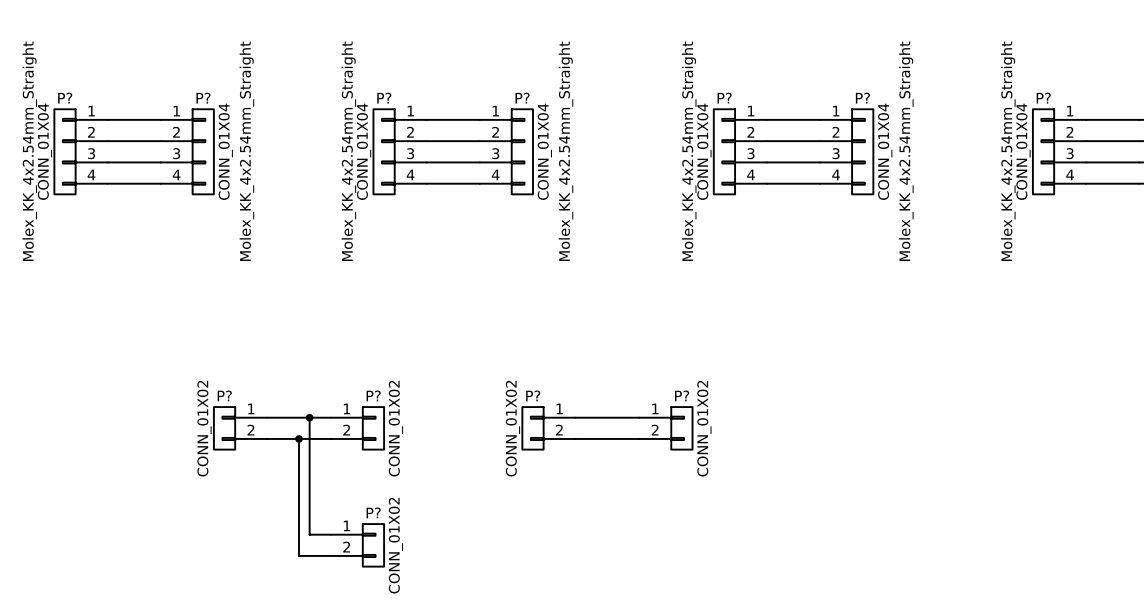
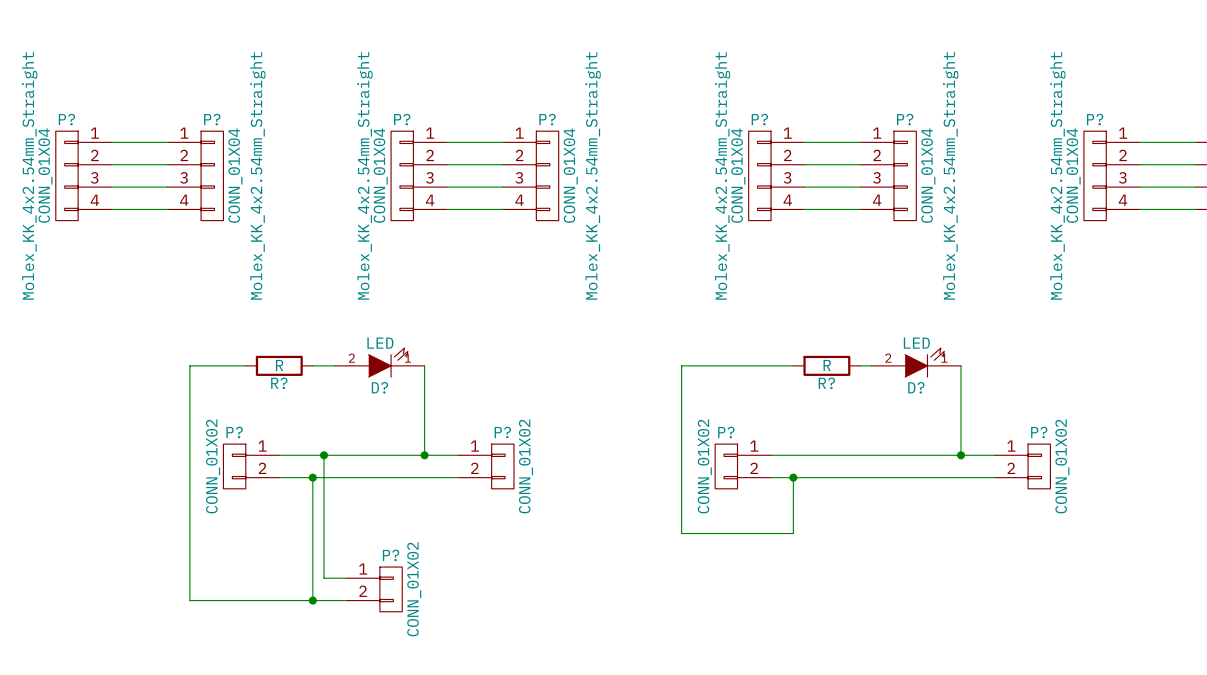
D?: none -> LED (379, 362)
D?: none -> LED (916, 362)
wire: none -> (245, 365) (189, 365) (189, 600) (312, 600)
R?: none -> R (279, 365)
wire: none -> (312, 365) (335, 365)
wire: none -> (424, 365) (424, 455)
wire: none -> (793, 365) (681, 365) (681, 533) (793, 533) (793, 477)
R?: none -> R (826, 365)
wire: none -> (860, 365) (871, 365)
wire: none -> (961, 365) (961, 455)
wire: none -> (346, 455) (458, 455)
junction: none -> (424, 455)
wire: (575, 417) (639, 417) -> none
wire: none -> (771, 455) (994, 455)
junction: none -> (961, 455)
P?: CONN_01X02 (357, 428) -> none
P?: none -> CONN_01X02 (486, 466)
P? position: (548, 428) -> (743, 466)
P?: CONN_01X02 (665, 428) -> none
P?: none -> CONN_01X02 (1022, 466)
wire: none -> (346, 477) (458, 477)
wire: (575, 438) (639, 438) -> none
wire: none -> (771, 477) (994, 477)
junction: none -> (793, 477)
junction: none -> (312, 600)

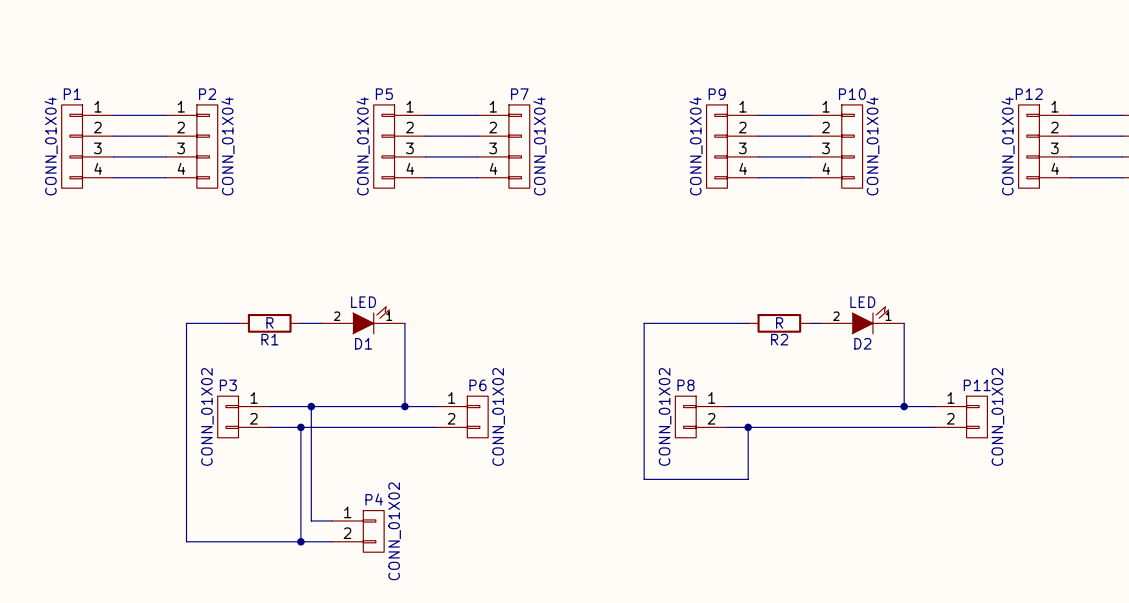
P? name: P? (66, 119) -> P1 (72, 94)
P? name: P? (212, 119) -> P2 (207, 94)
P? name: P? (402, 119) -> P5 (384, 94)
P? name: P? (547, 119) -> P7 (519, 94)
P? name: P? (759, 119) -> P9 (717, 94)
P? name: P? (905, 119) -> P10 (852, 94)
P? name: P? (1095, 119) -> P12 (1029, 94)
P? text: Molex_KK_4x2.54mm_Straight (29, 175) -> none
P? text: Molex_KK_4x2.54mm_Straight (257, 175) -> none
P? text: Molex_KK_4x2.54mm_Straight (364, 175) -> none
P? text: Molex_KK_4x2.54mm_Straight (593, 175) -> none
P? text: Molex_KK_4x2.54mm_Straight (722, 175) -> none
P? text: Molex_KK_4x2.54mm_Straight (950, 175) -> none
P? text: Molex_KK_4x2.54mm_Straight (1057, 175) -> none
R? name: R? (279, 383) -> R1 (269, 339)
R? name: R? (826, 383) -> R2 (779, 339)
D? name: D? (379, 387) -> D1 (363, 343)
D? name: D? (916, 387) -> D2 (862, 343)
P? name: P? (234, 432) -> P3 (228, 385)
P? name: P? (502, 432) -> P6 (477, 385)
P? name: P? (726, 432) -> P8 (686, 385)
P? name: P? (1039, 432) -> P11 (977, 385)
P? name: P? (391, 555) -> P4 (374, 499)

